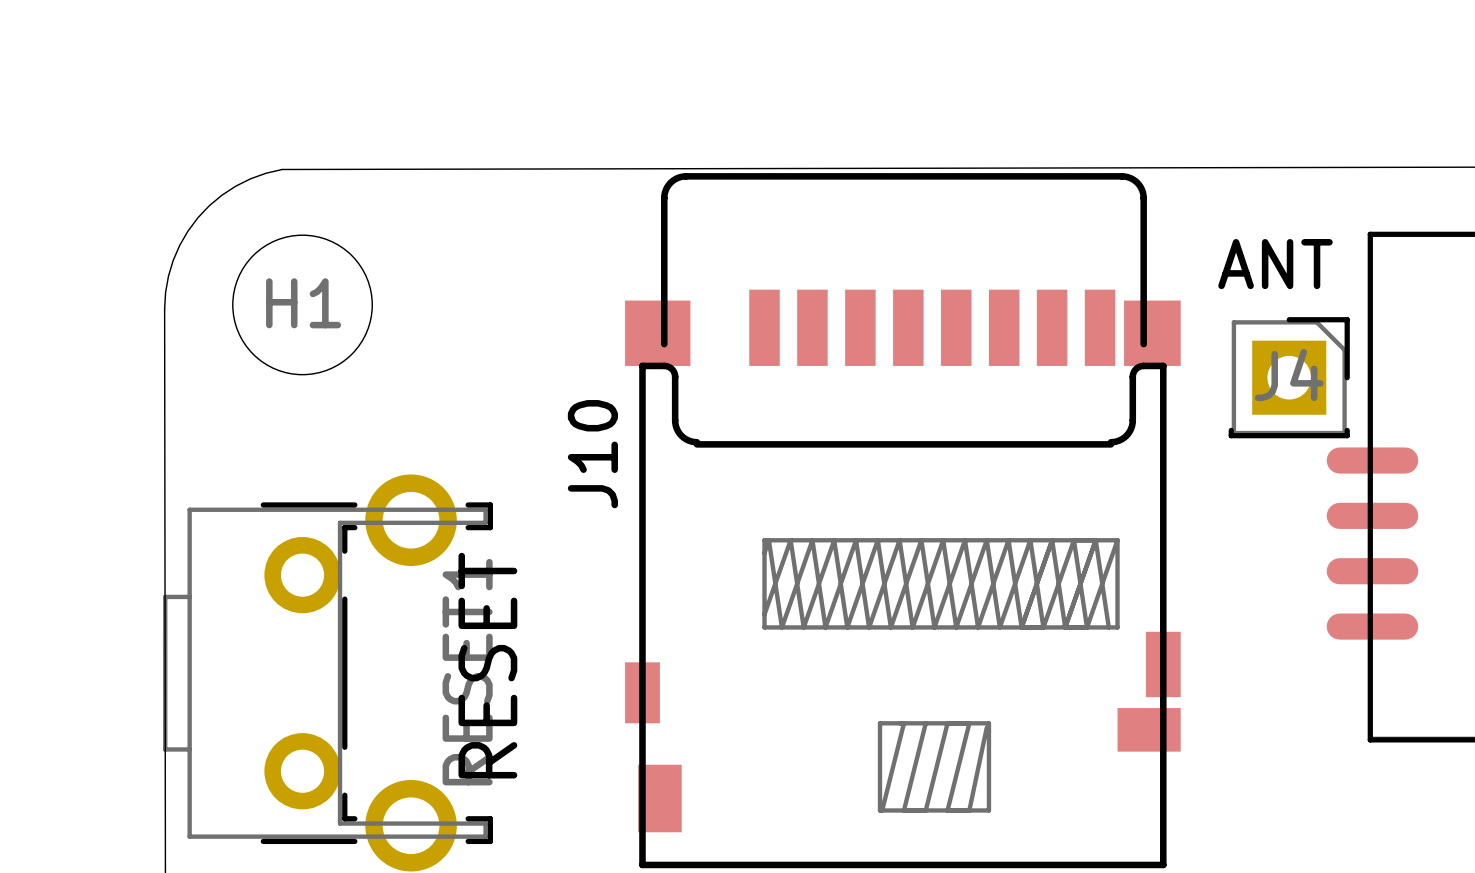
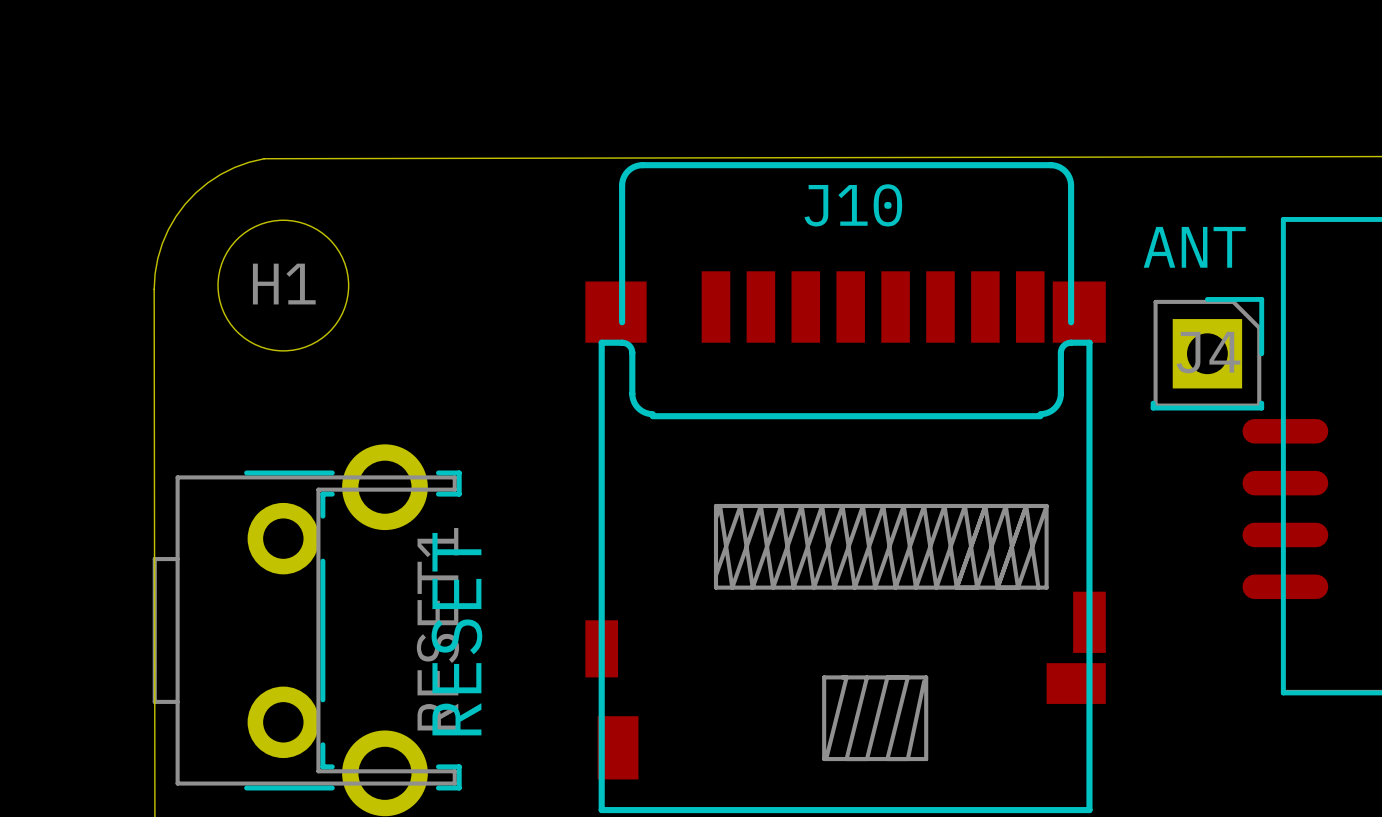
J10 name rotation: 0° (592, 454) -> 90° clockwise (853, 205)
J10 name position: J10 (592, 454) -> J10 (853, 205)

